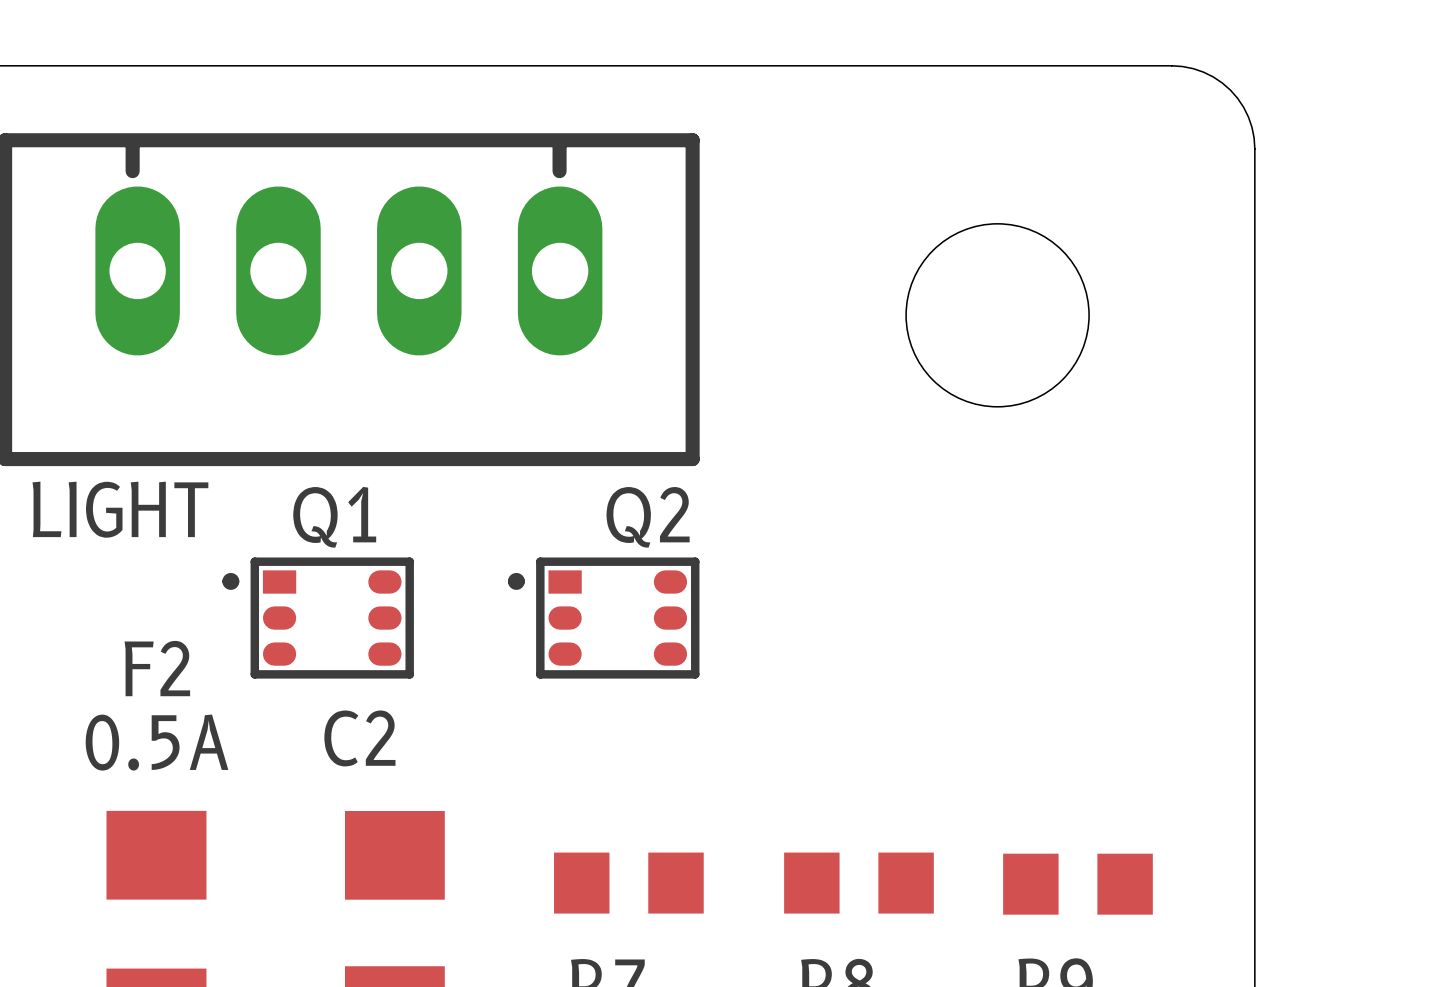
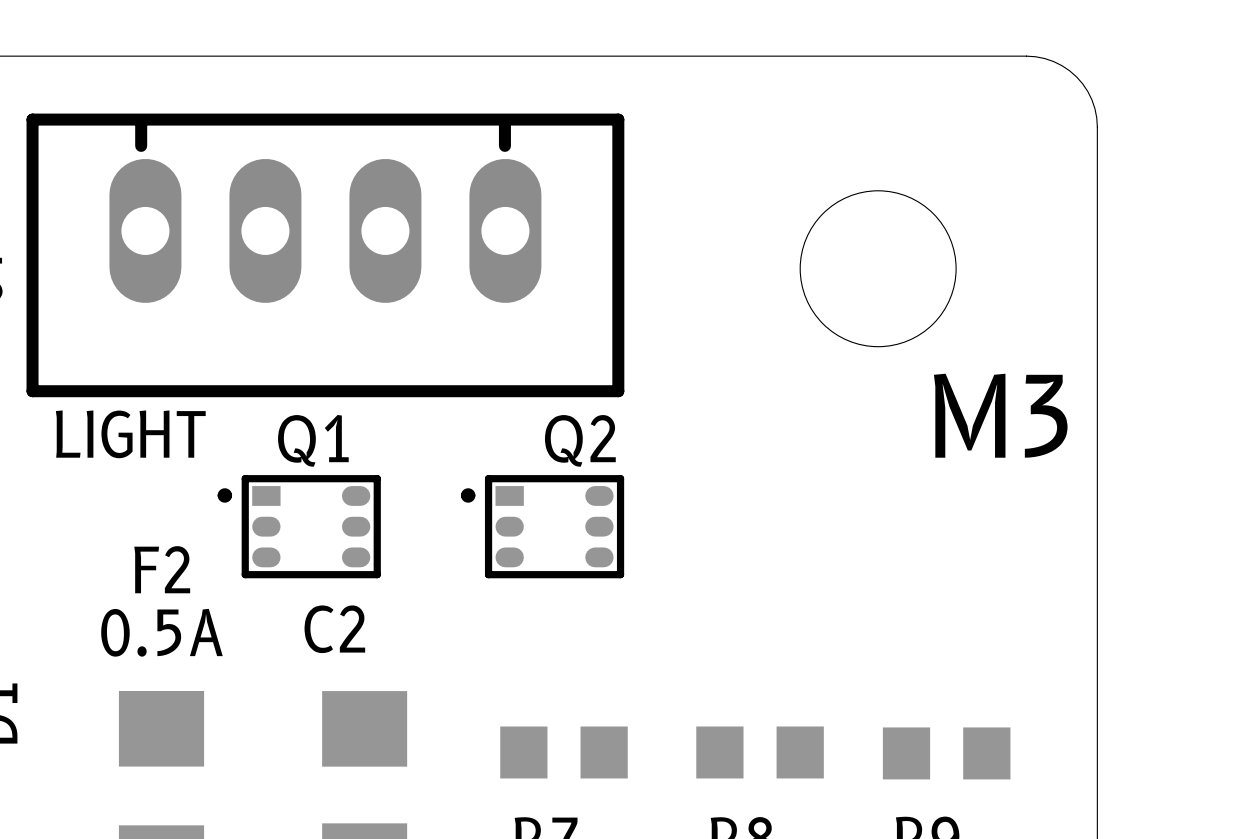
text: none -> M3 (1000, 415)

